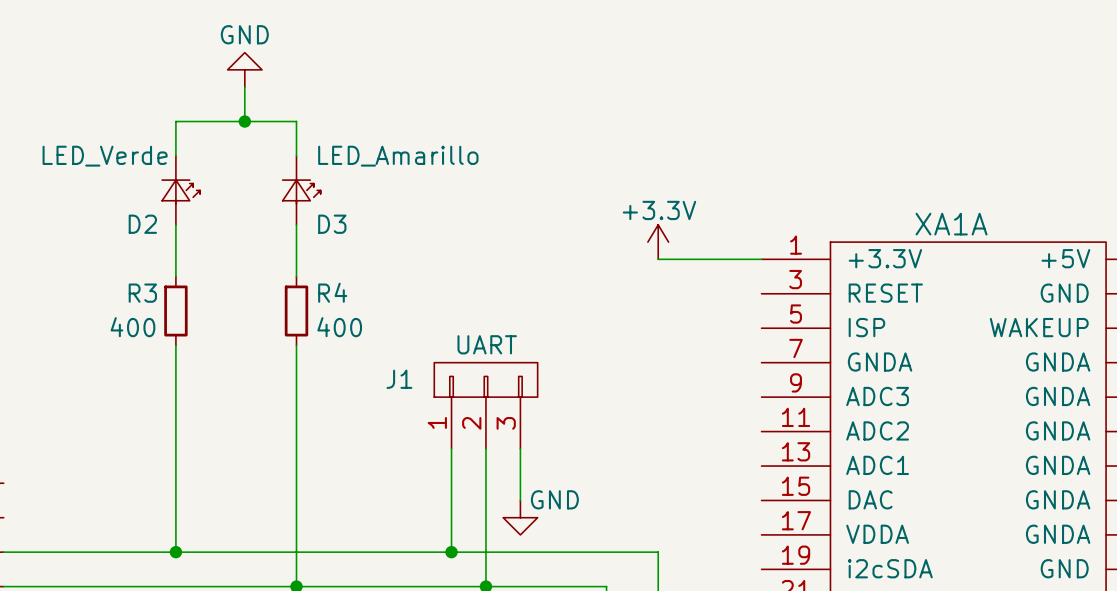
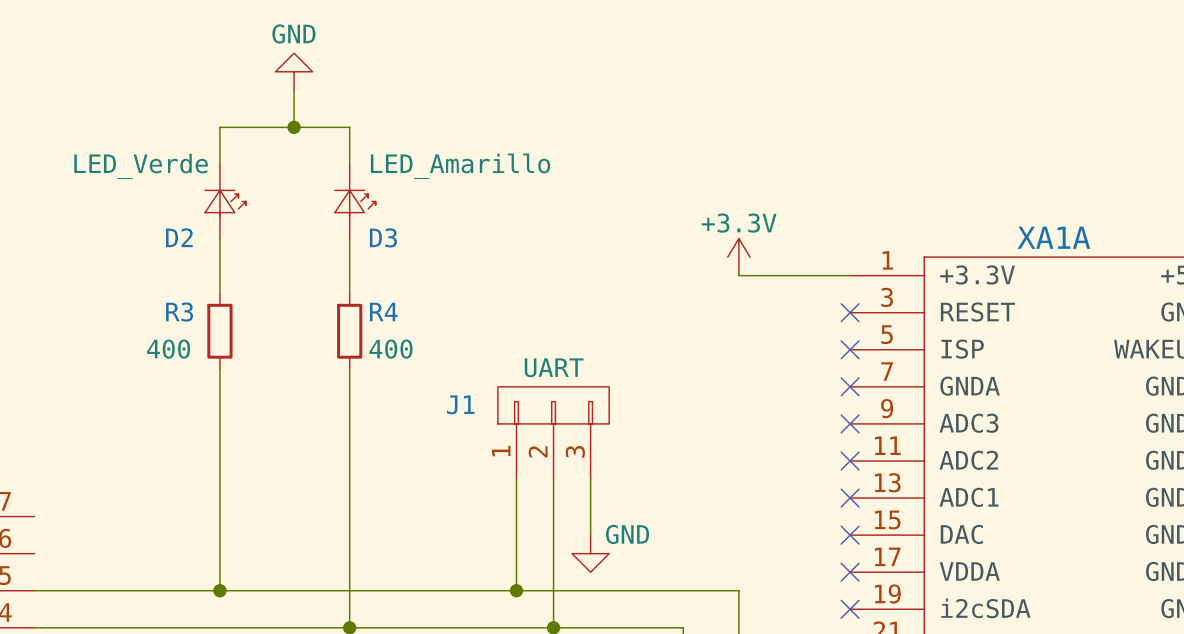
no-connect mark: none -> (850, 312)
no-connect mark: none -> (850, 349)
no-connect mark: none -> (850, 386)
no-connect mark: none -> (850, 423)
no-connect mark: none -> (850, 460)
no-connect mark: none -> (850, 498)
no-connect mark: none -> (850, 535)
no-connect mark: none -> (850, 572)
no-connect mark: none -> (850, 609)

